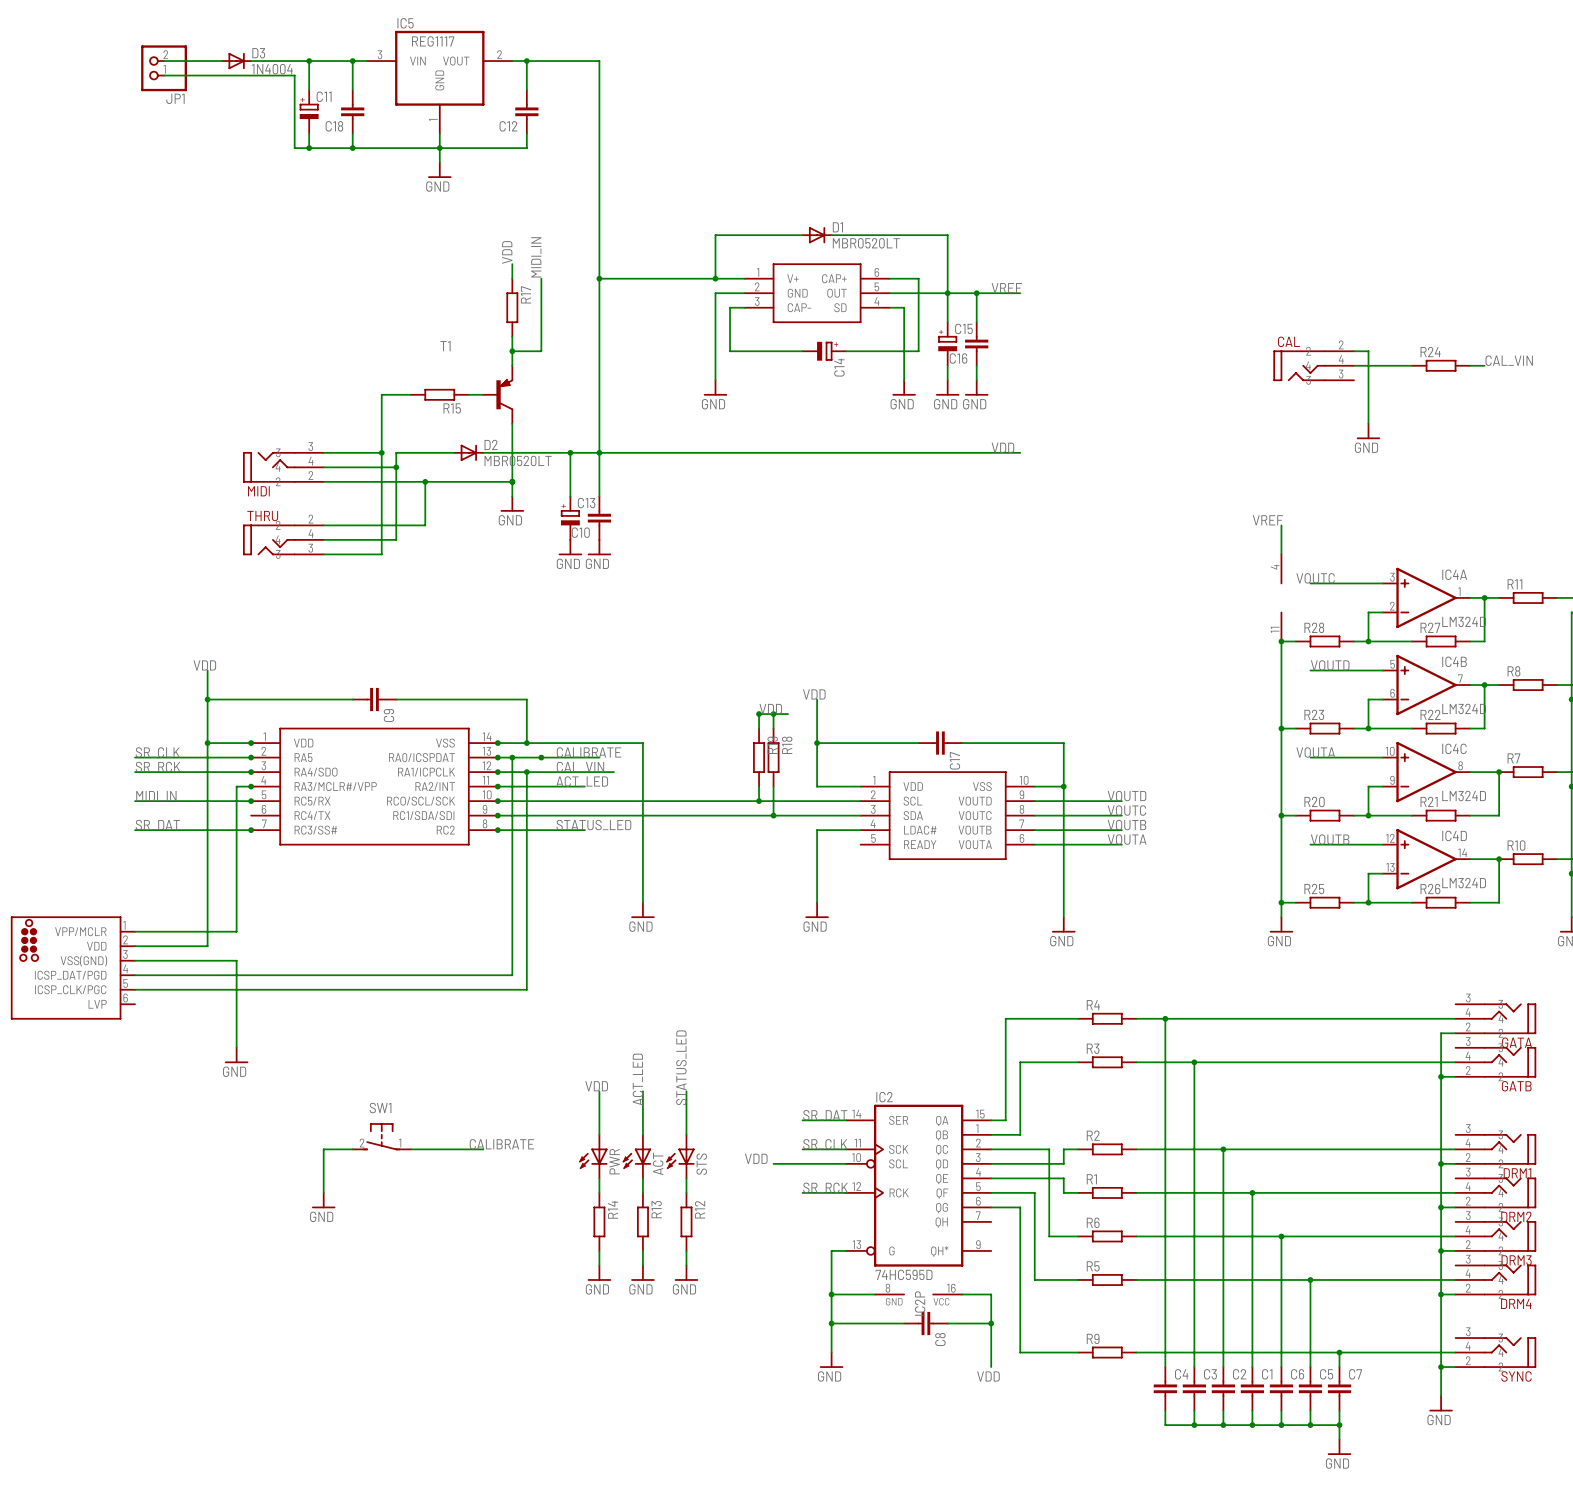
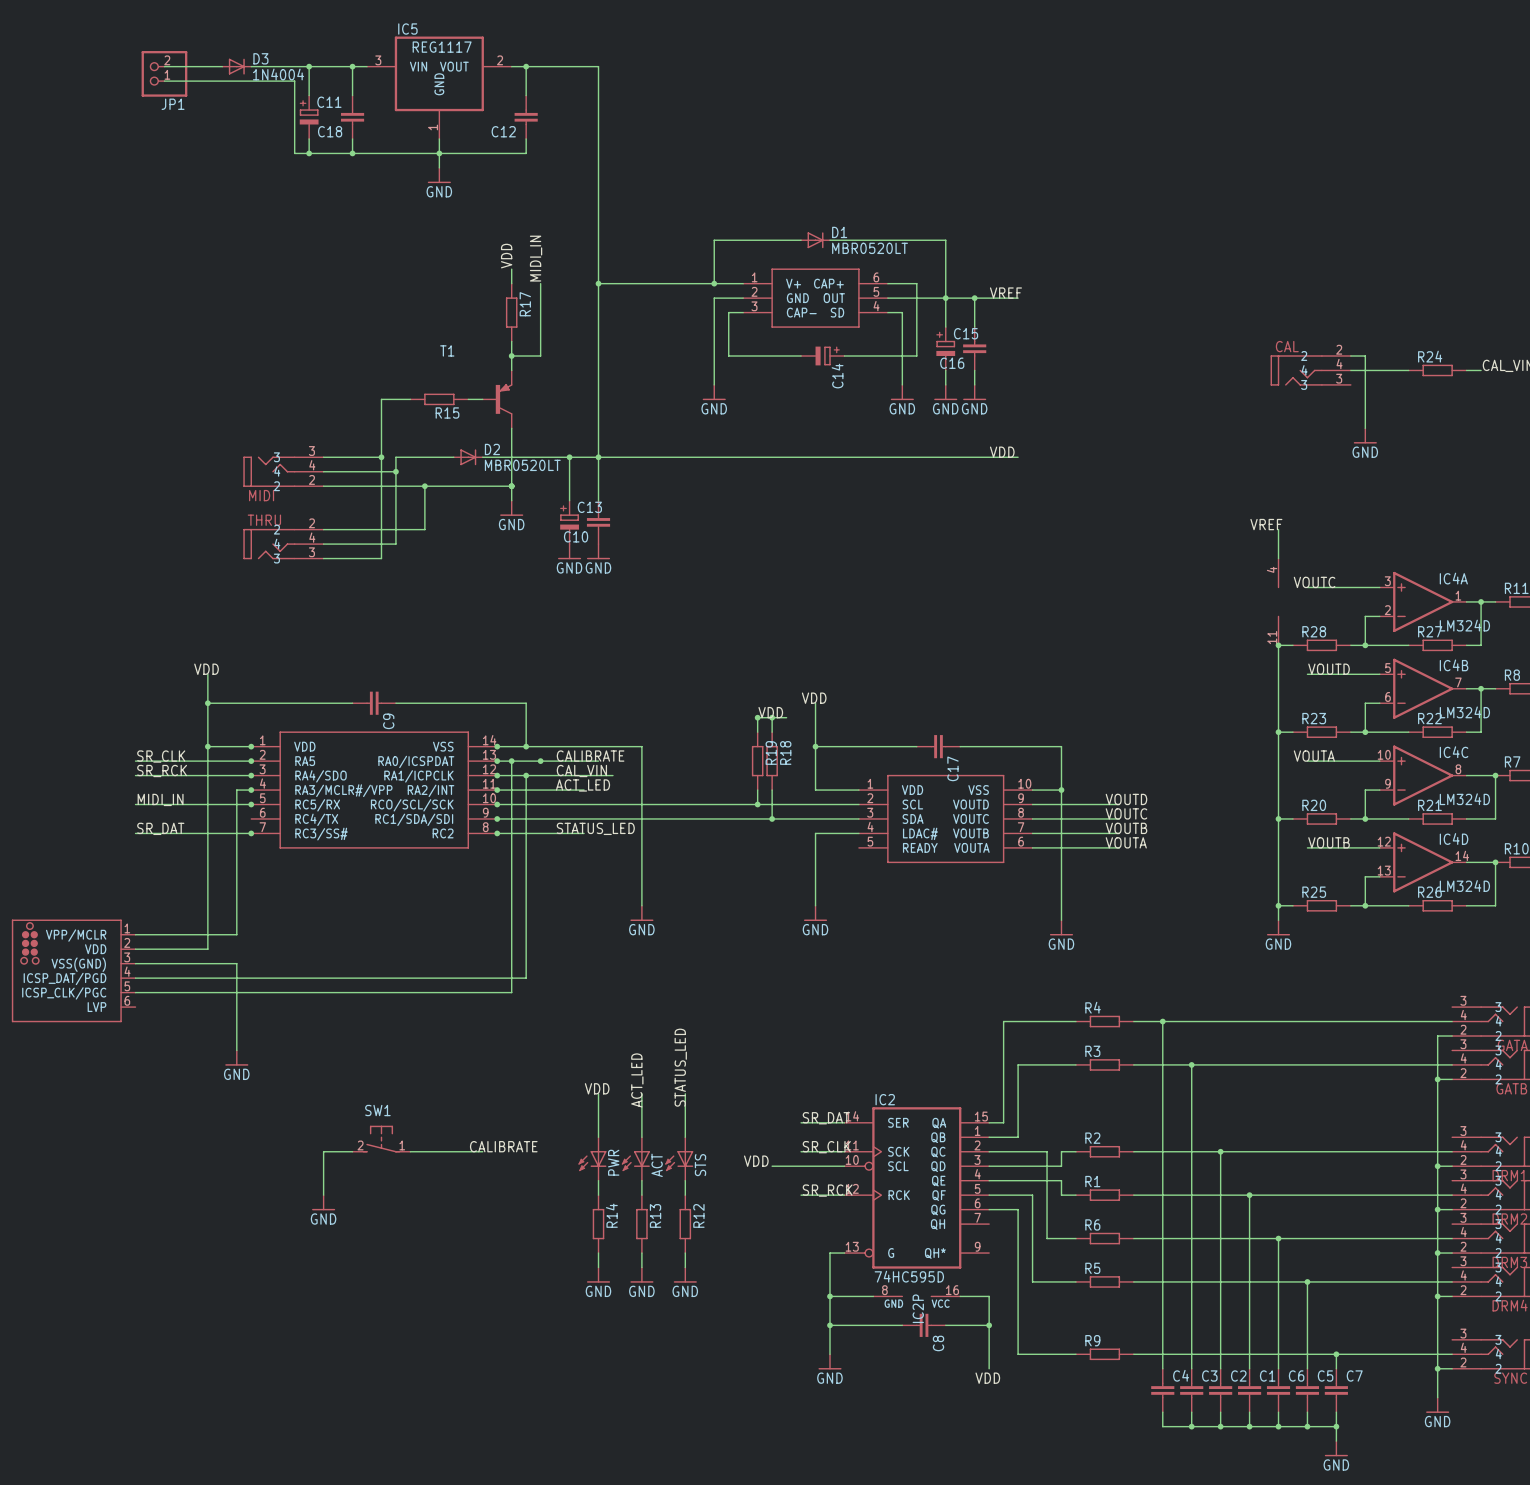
wire: (526, 975) (526, 989) (512, 989) -> (526, 978) (511, 978) (511, 992)

